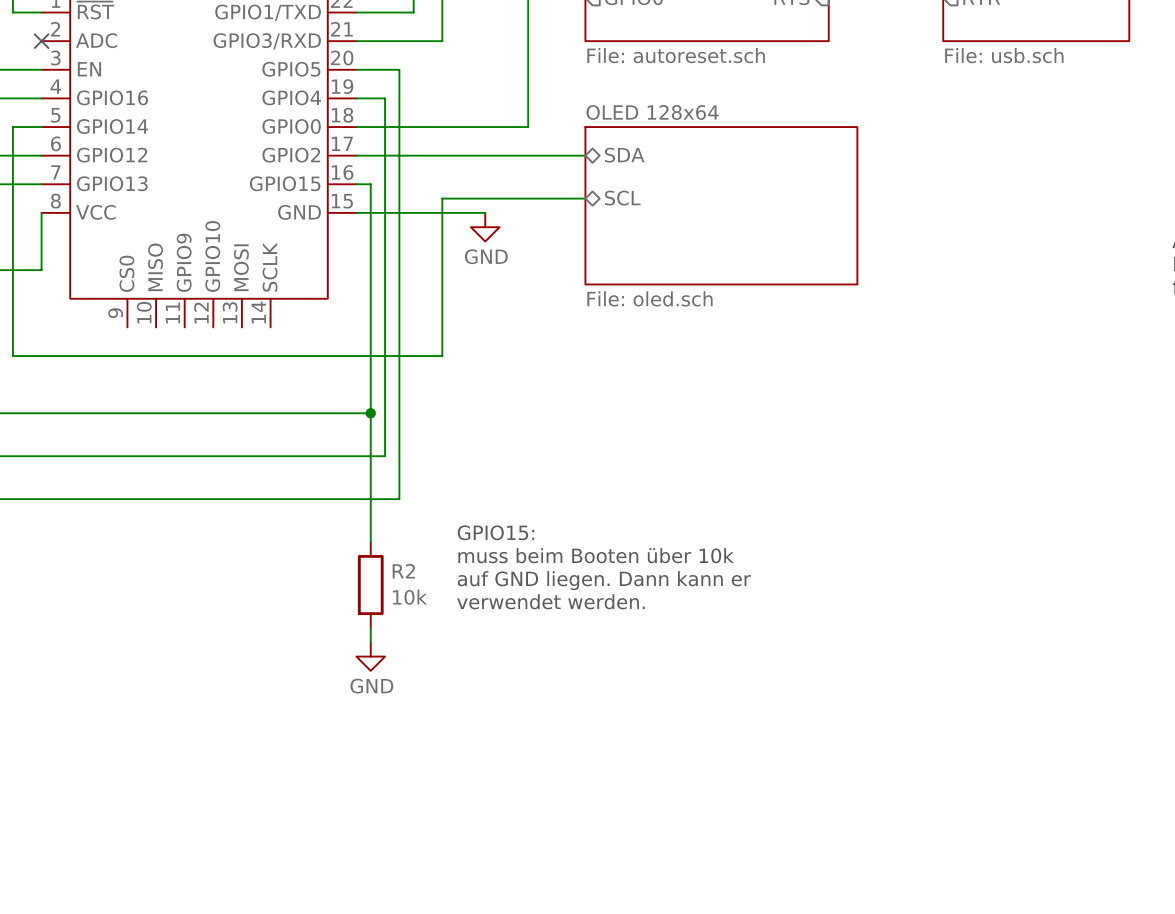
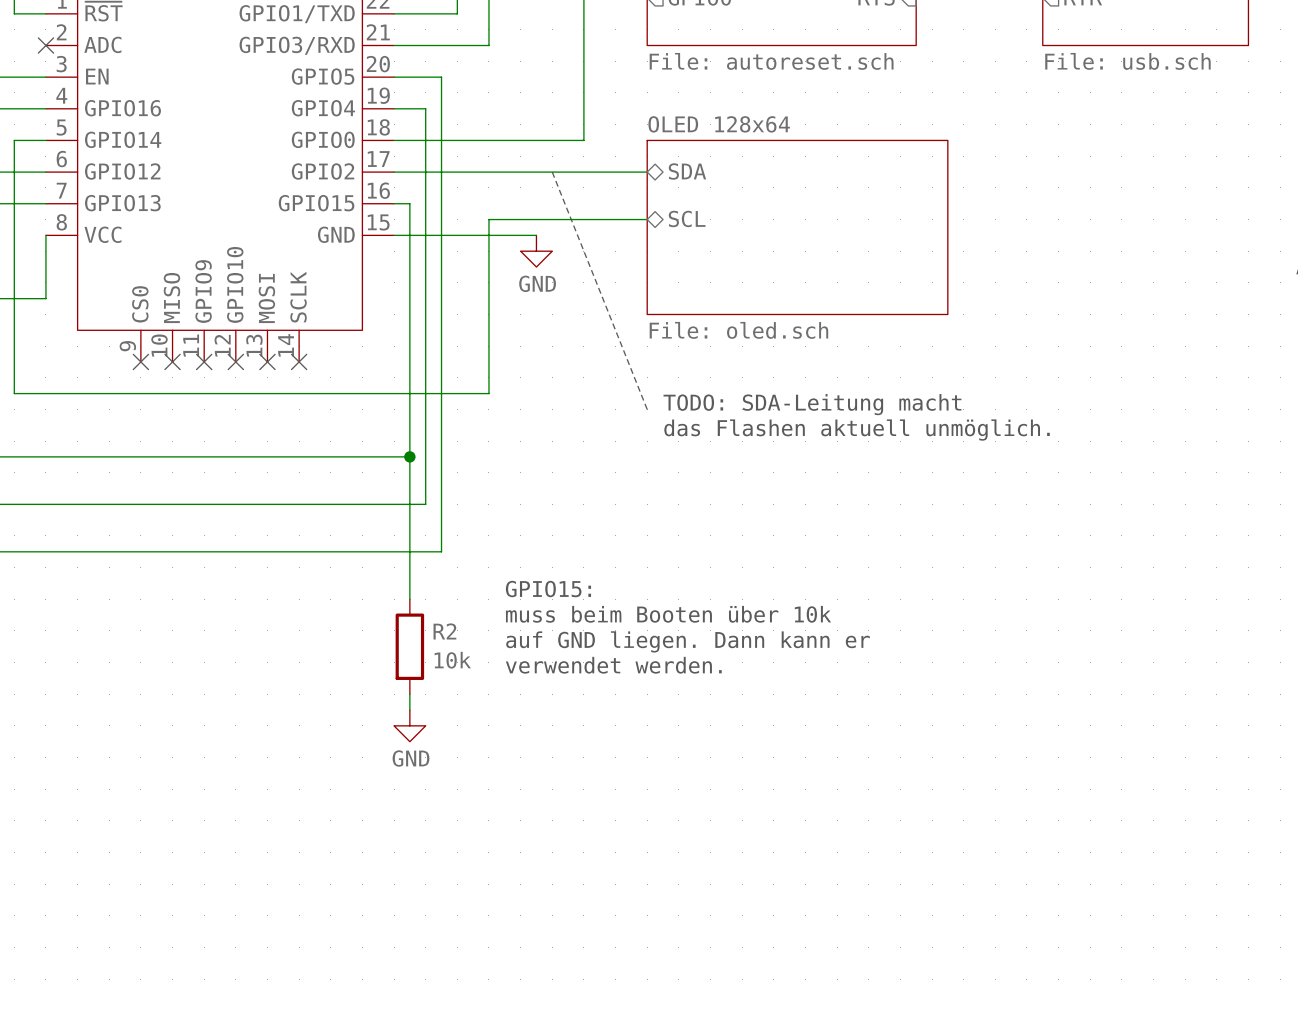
line: none -> (552, 172) (647, 409)
no-connect mark: none -> (140, 361)
no-connect mark: none -> (172, 361)
no-connect mark: none -> (204, 361)
no-connect mark: none -> (235, 361)
no-connect mark: none -> (267, 361)
no-connect mark: none -> (299, 361)
text: none -> TODO: SDA-Leitung macht (812, 404)
text: none -> das Flashen aktuell unmöglich. (857, 430)

